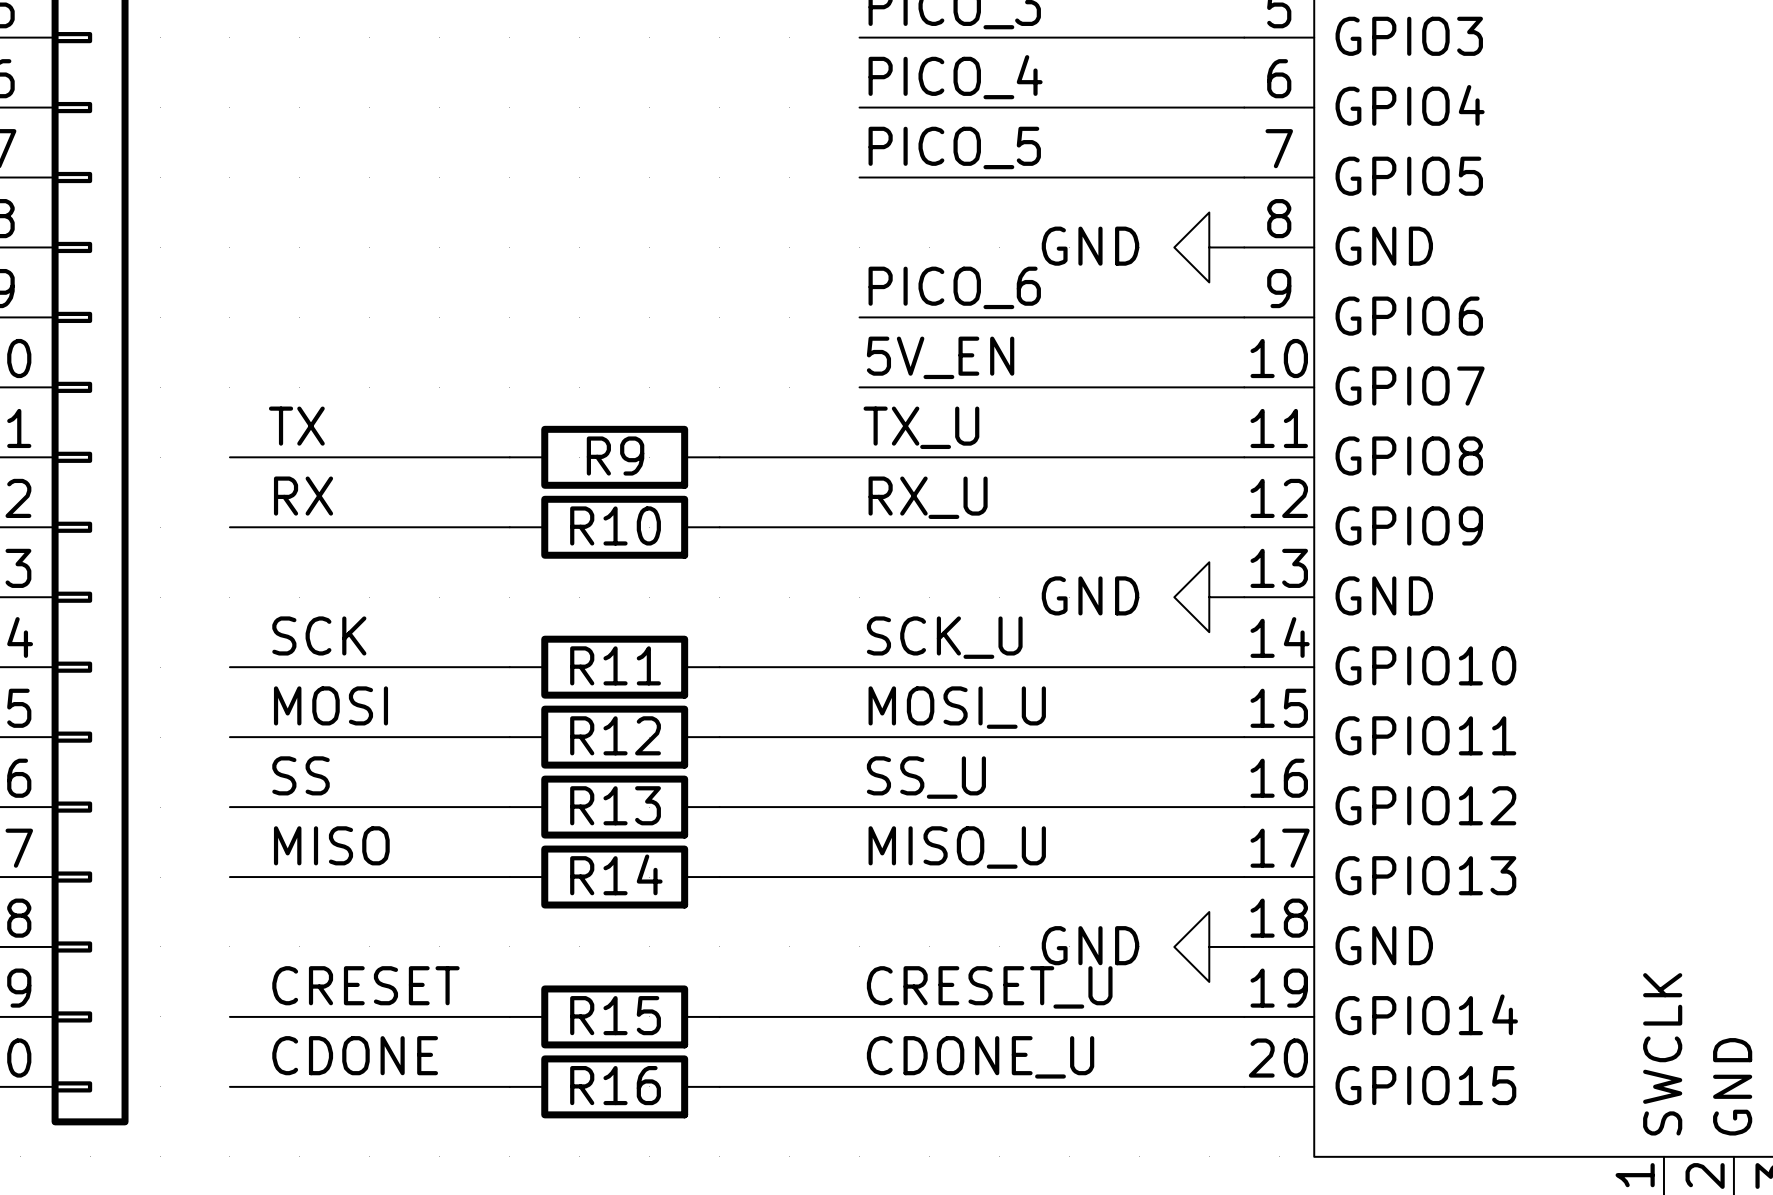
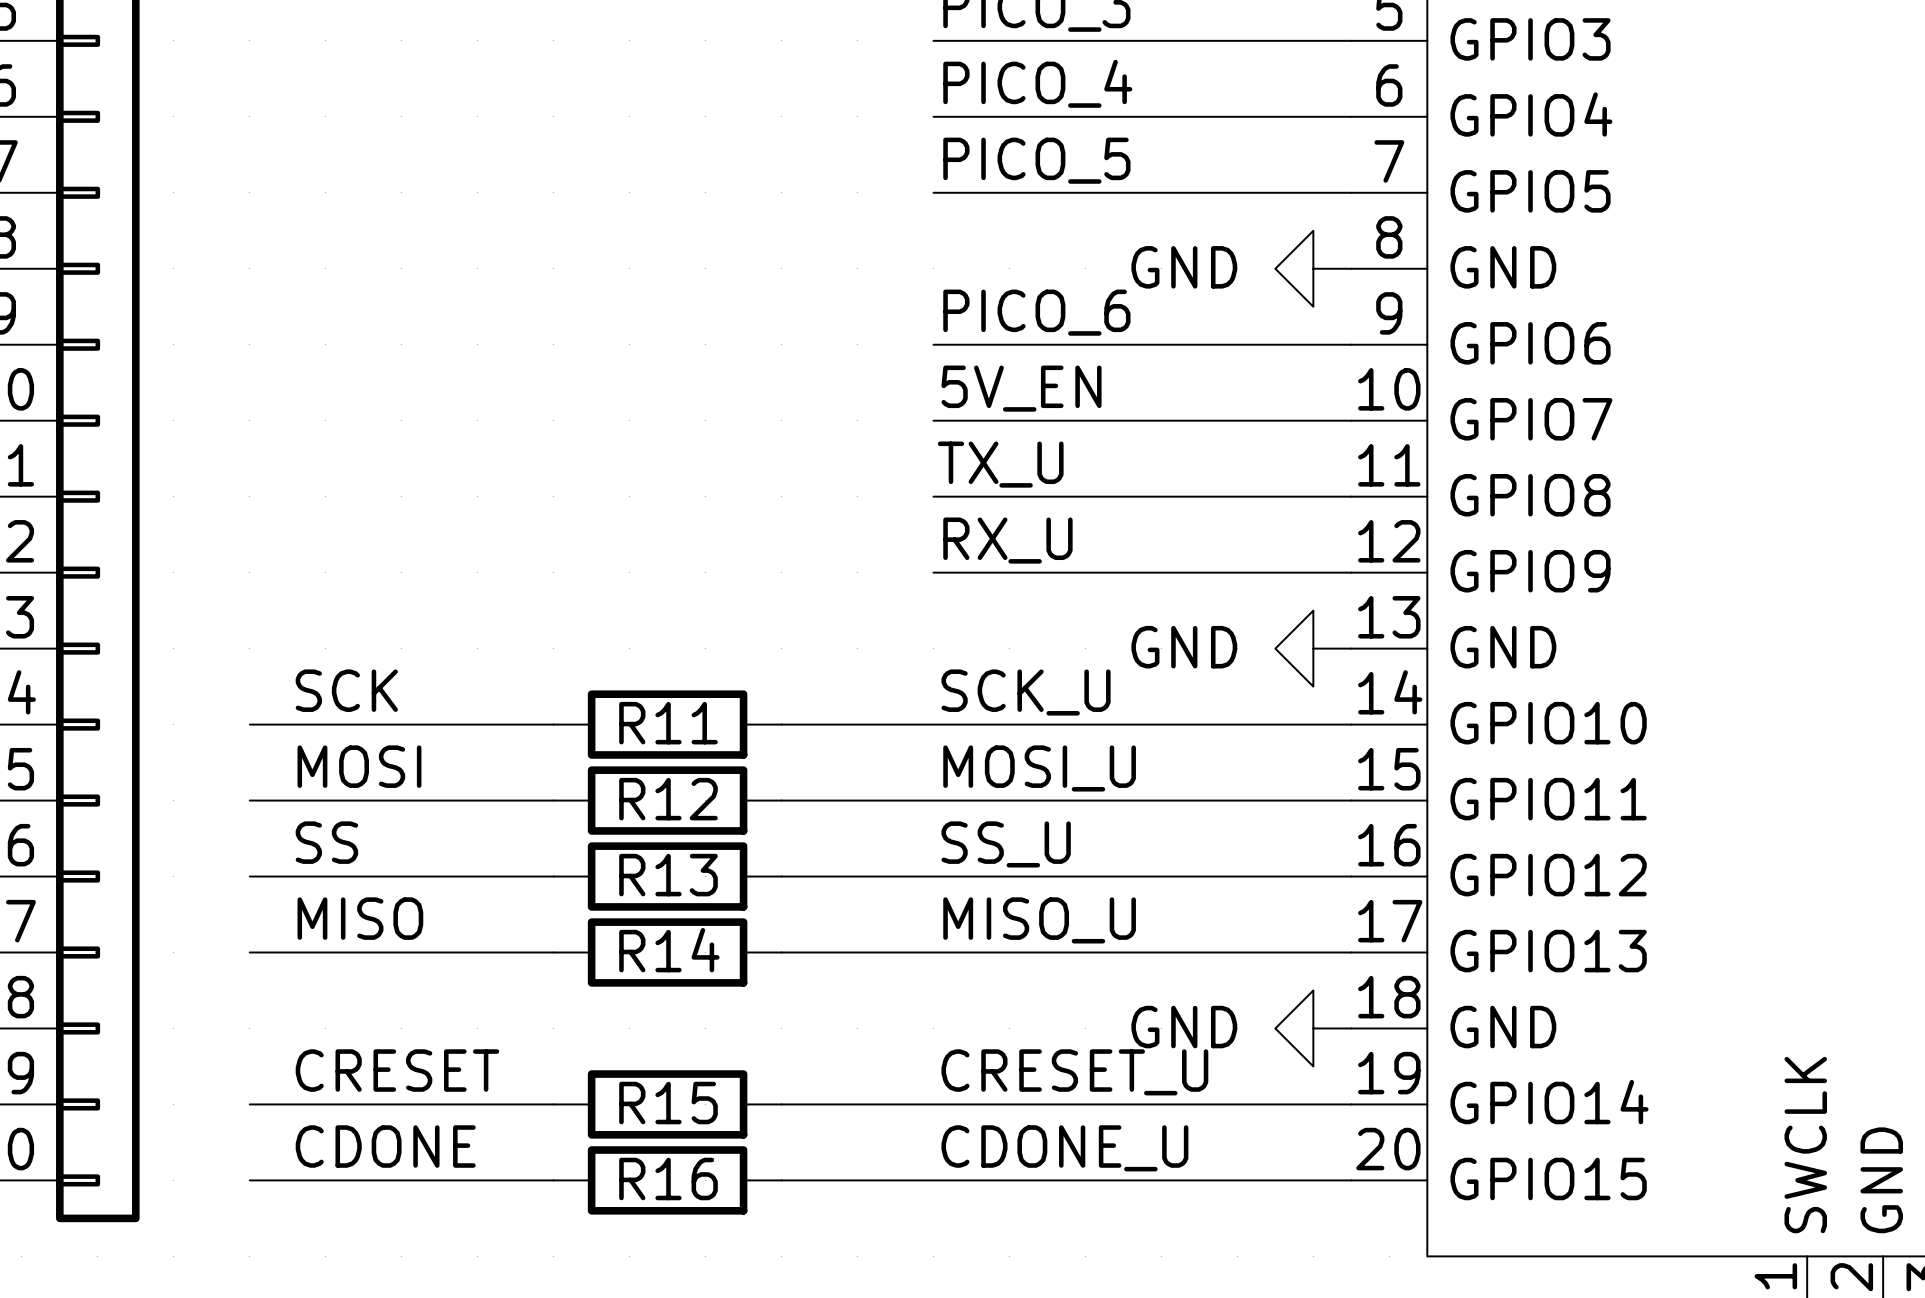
label: TX (296, 426) -> none
wire: (229, 457) (509, 457) -> none
R9: (614, 457) -> none
wire: (719, 457) (859, 457) -> none
label: RX (303, 496) -> none
wire: (229, 527) (509, 527) -> none
R10: (614, 527) -> none
wire: (719, 527) (859, 527) -> none

